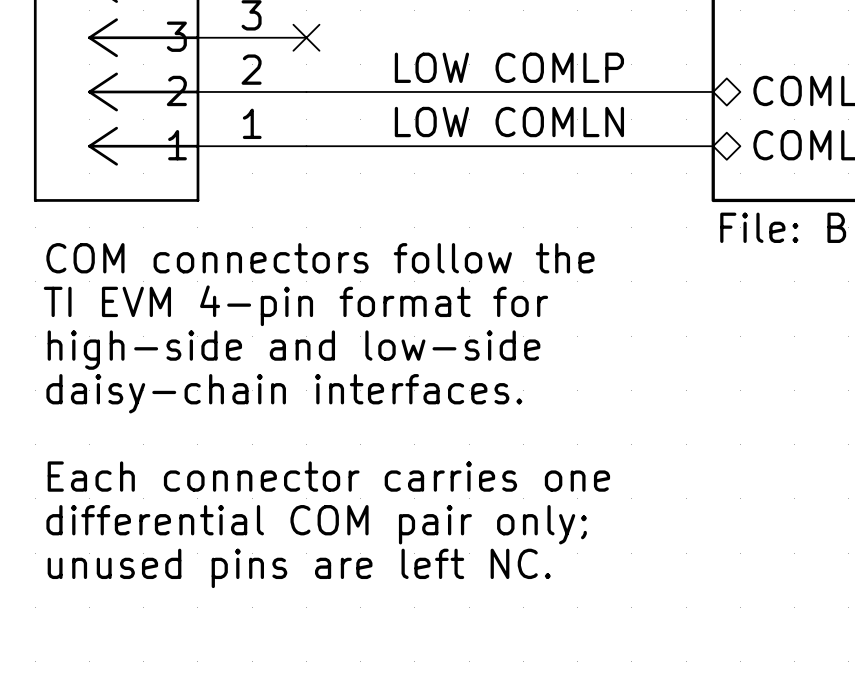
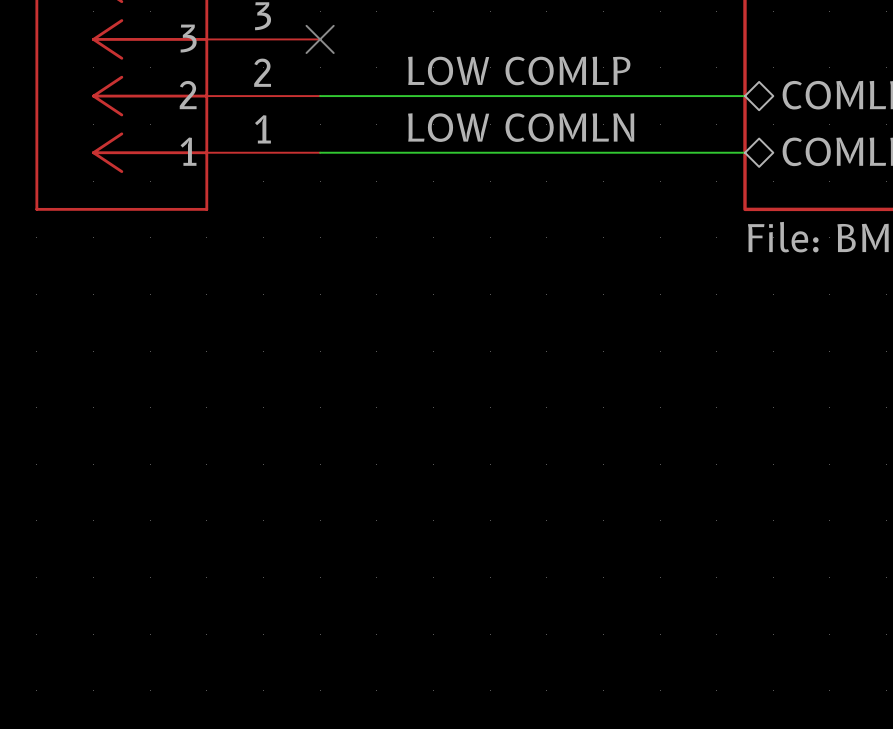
text: COM connectors follow the (320, 258) -> none
text: TI EVM 4-pin format for (295, 305) -> none
text: high-side and low-side (294, 350) -> none
text: daisy-chain interfaces. (284, 393) -> none
text: Each connector carries one (328, 476) -> none
text: differential COM pair only; (316, 524) -> none
text: unused pins are left NC. (299, 568) -> none

